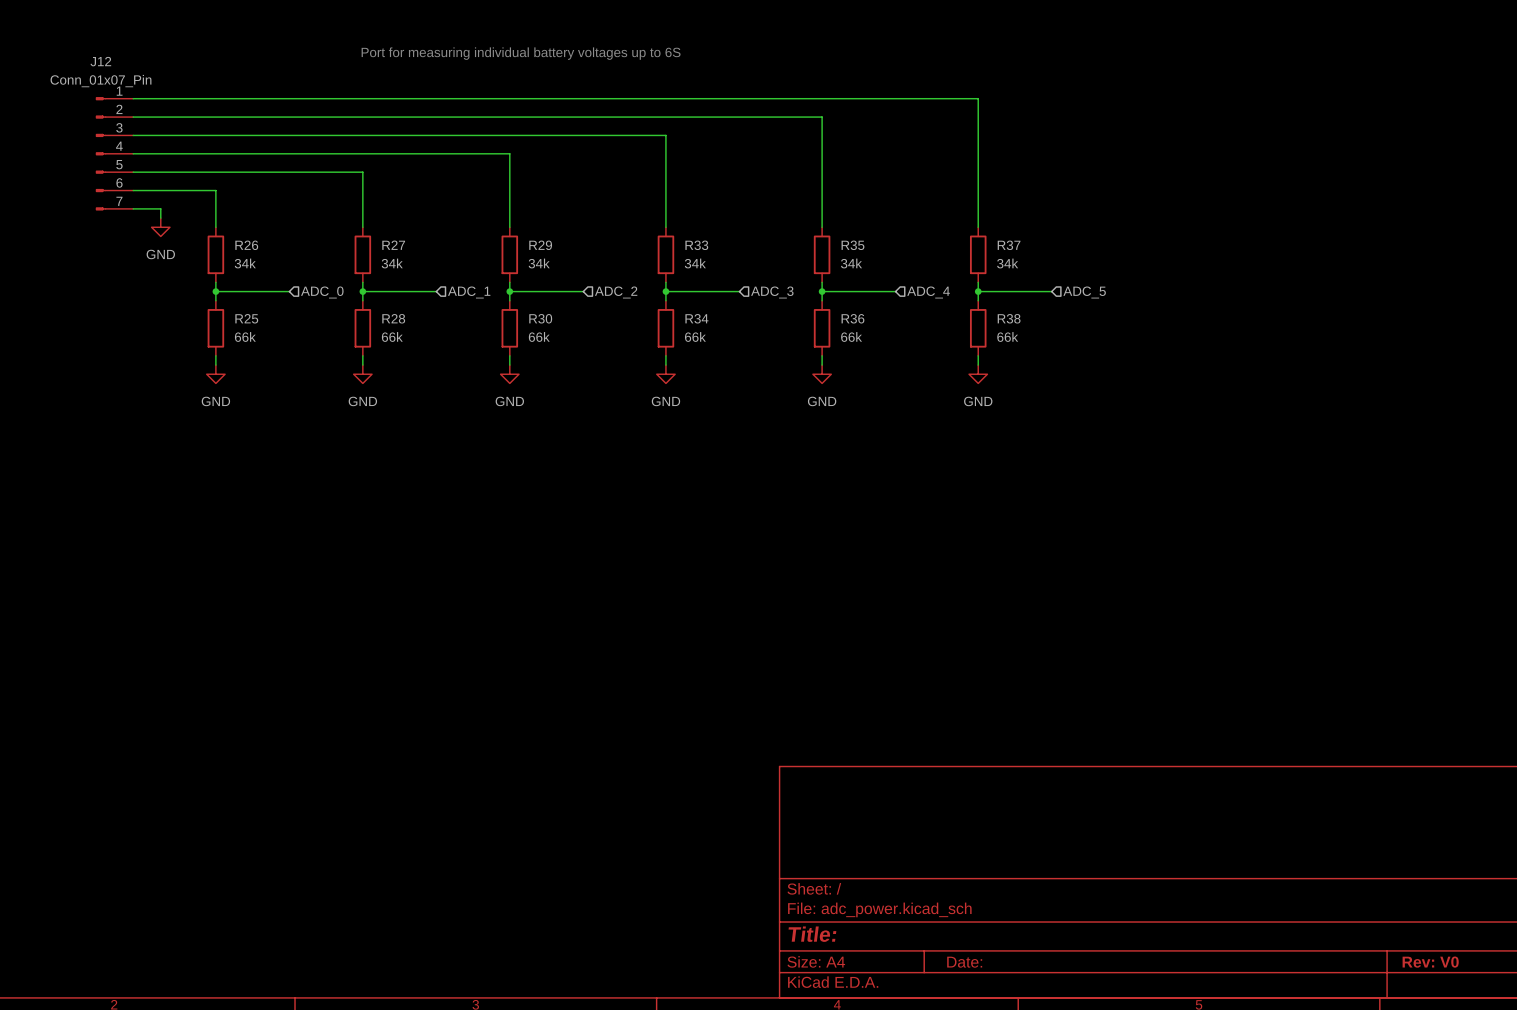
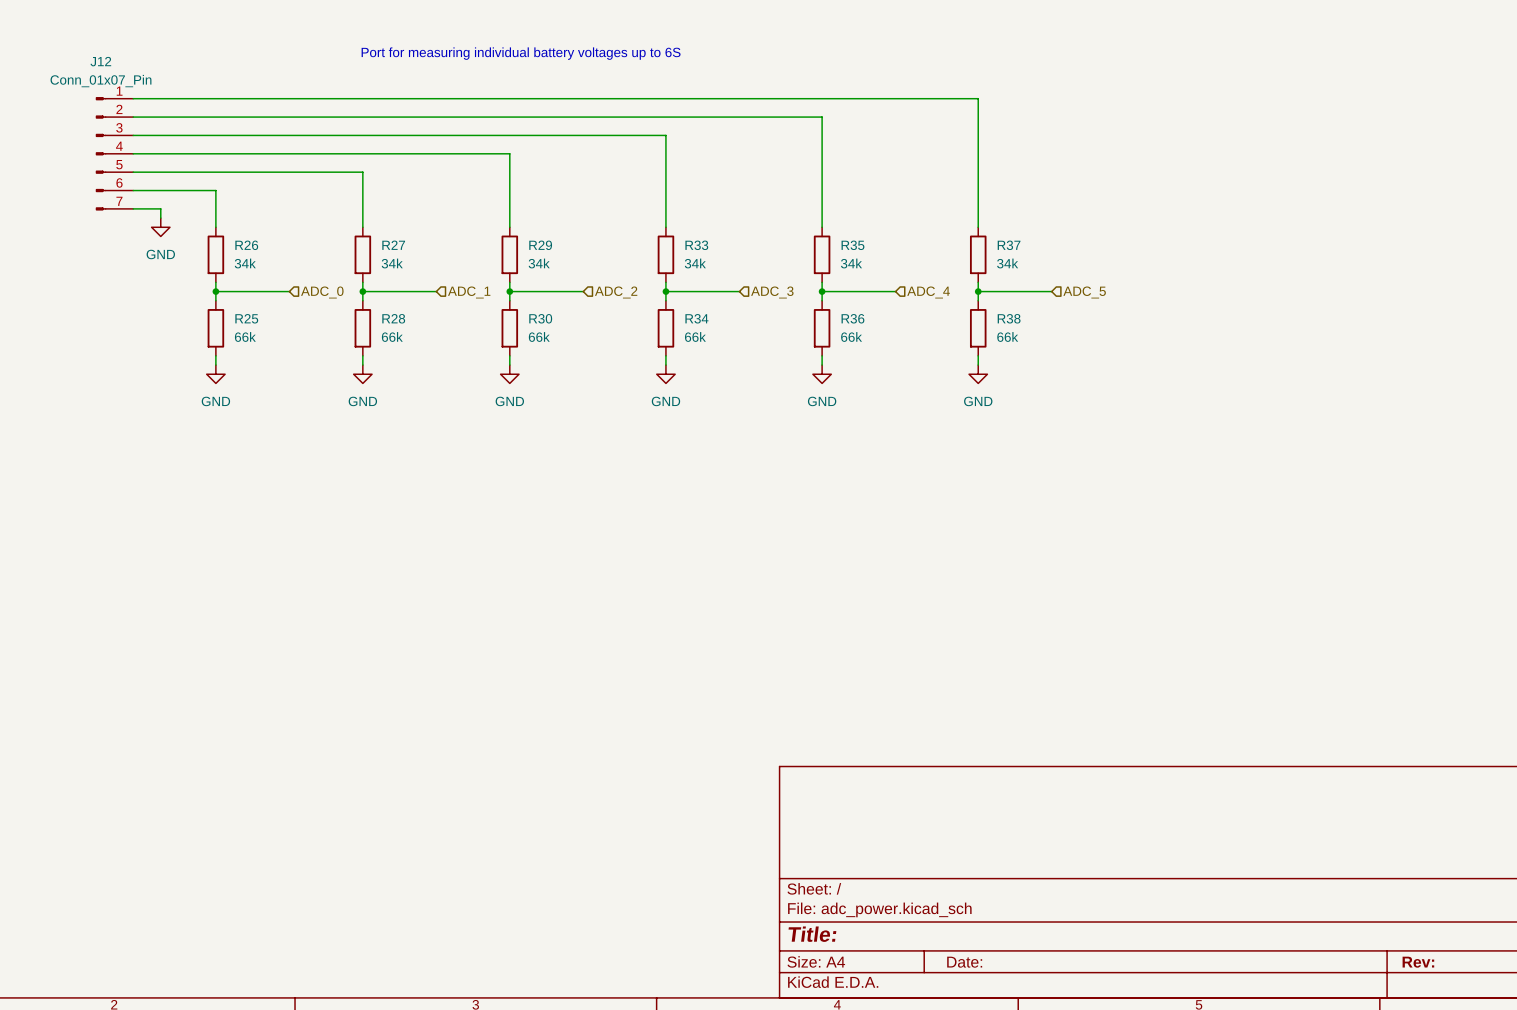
title block: Rev: V0 (1430, 962) -> Rev: (1418, 962)

